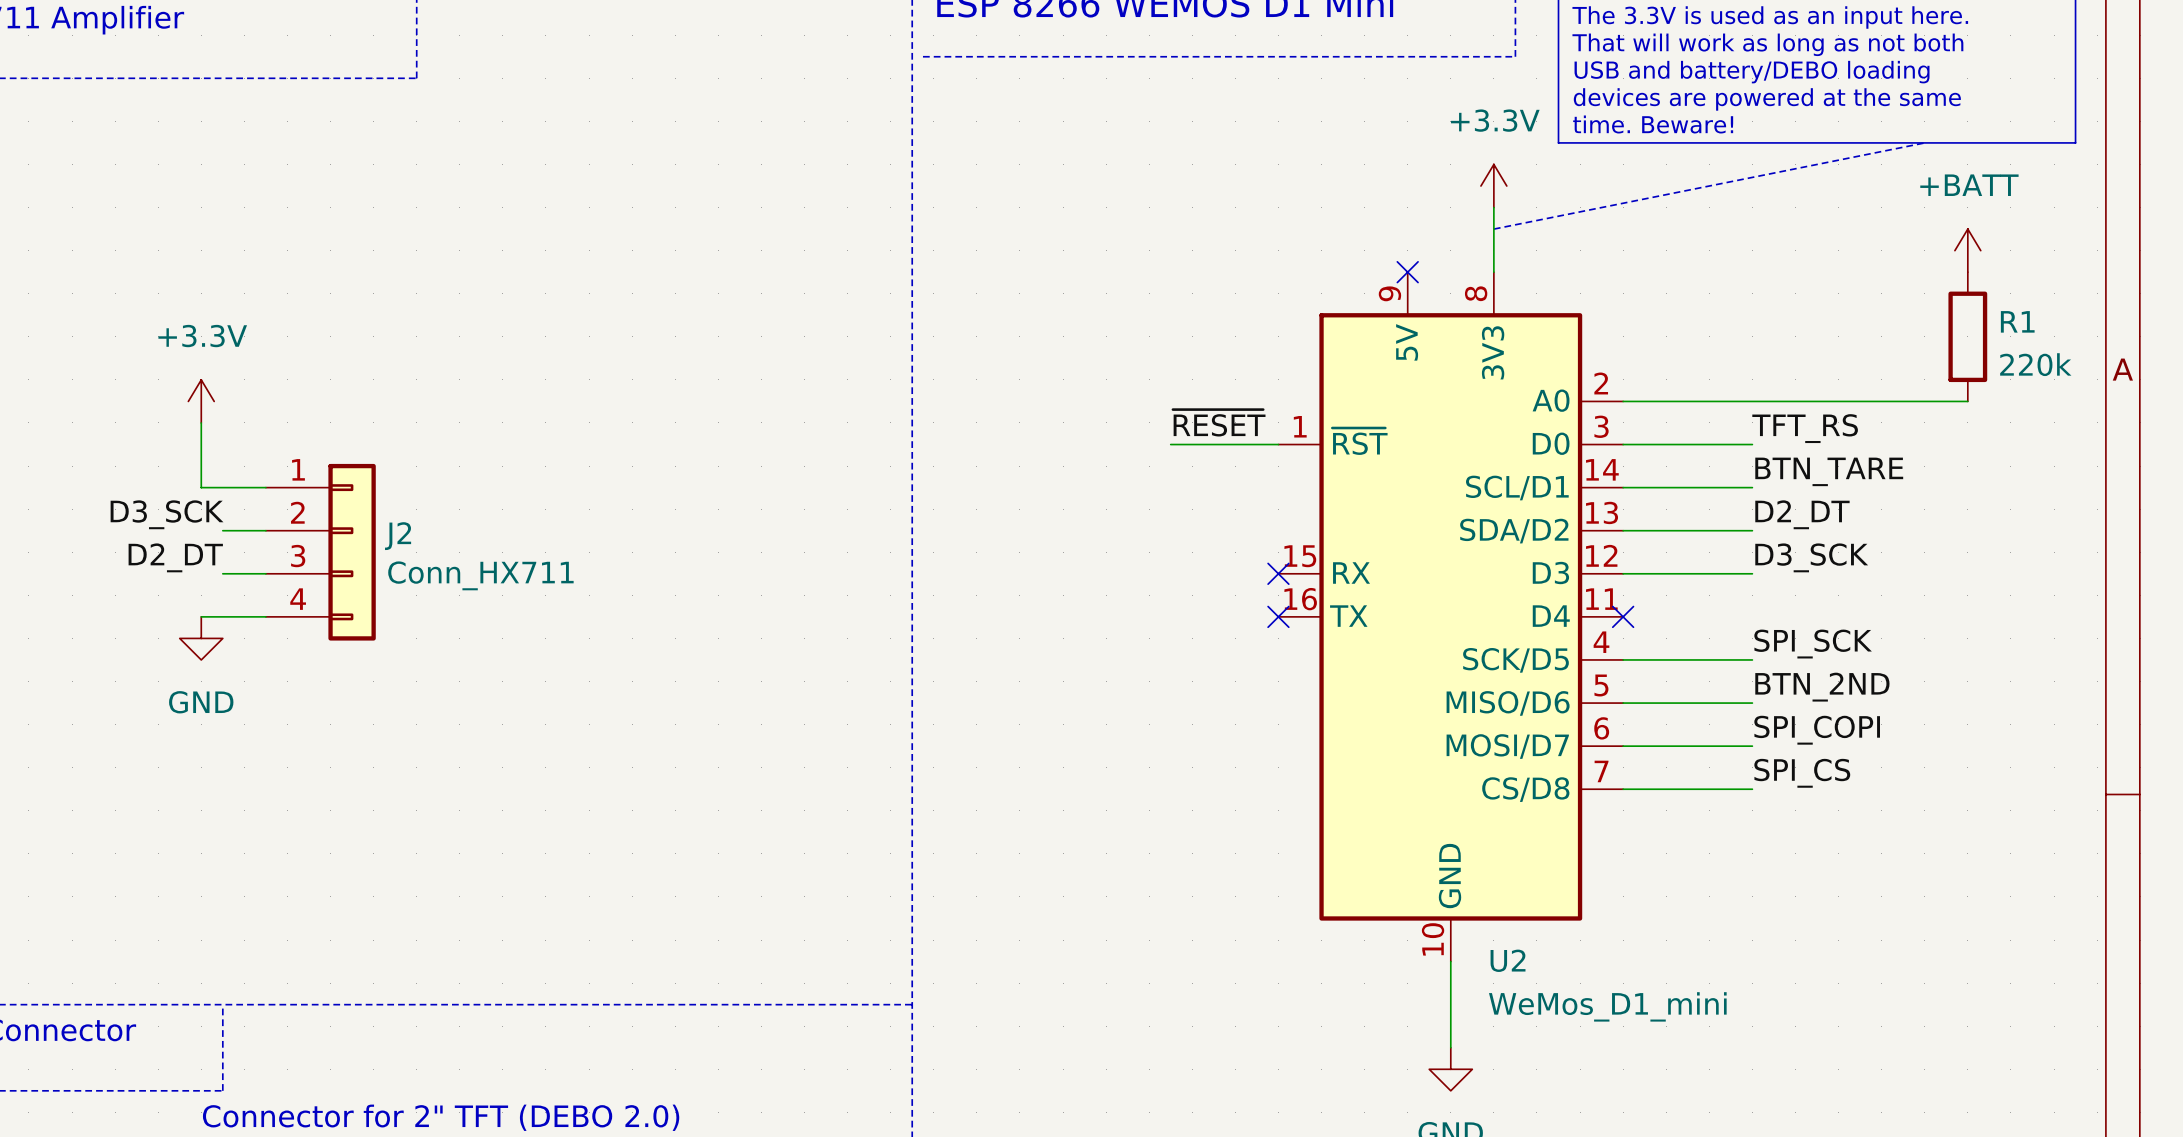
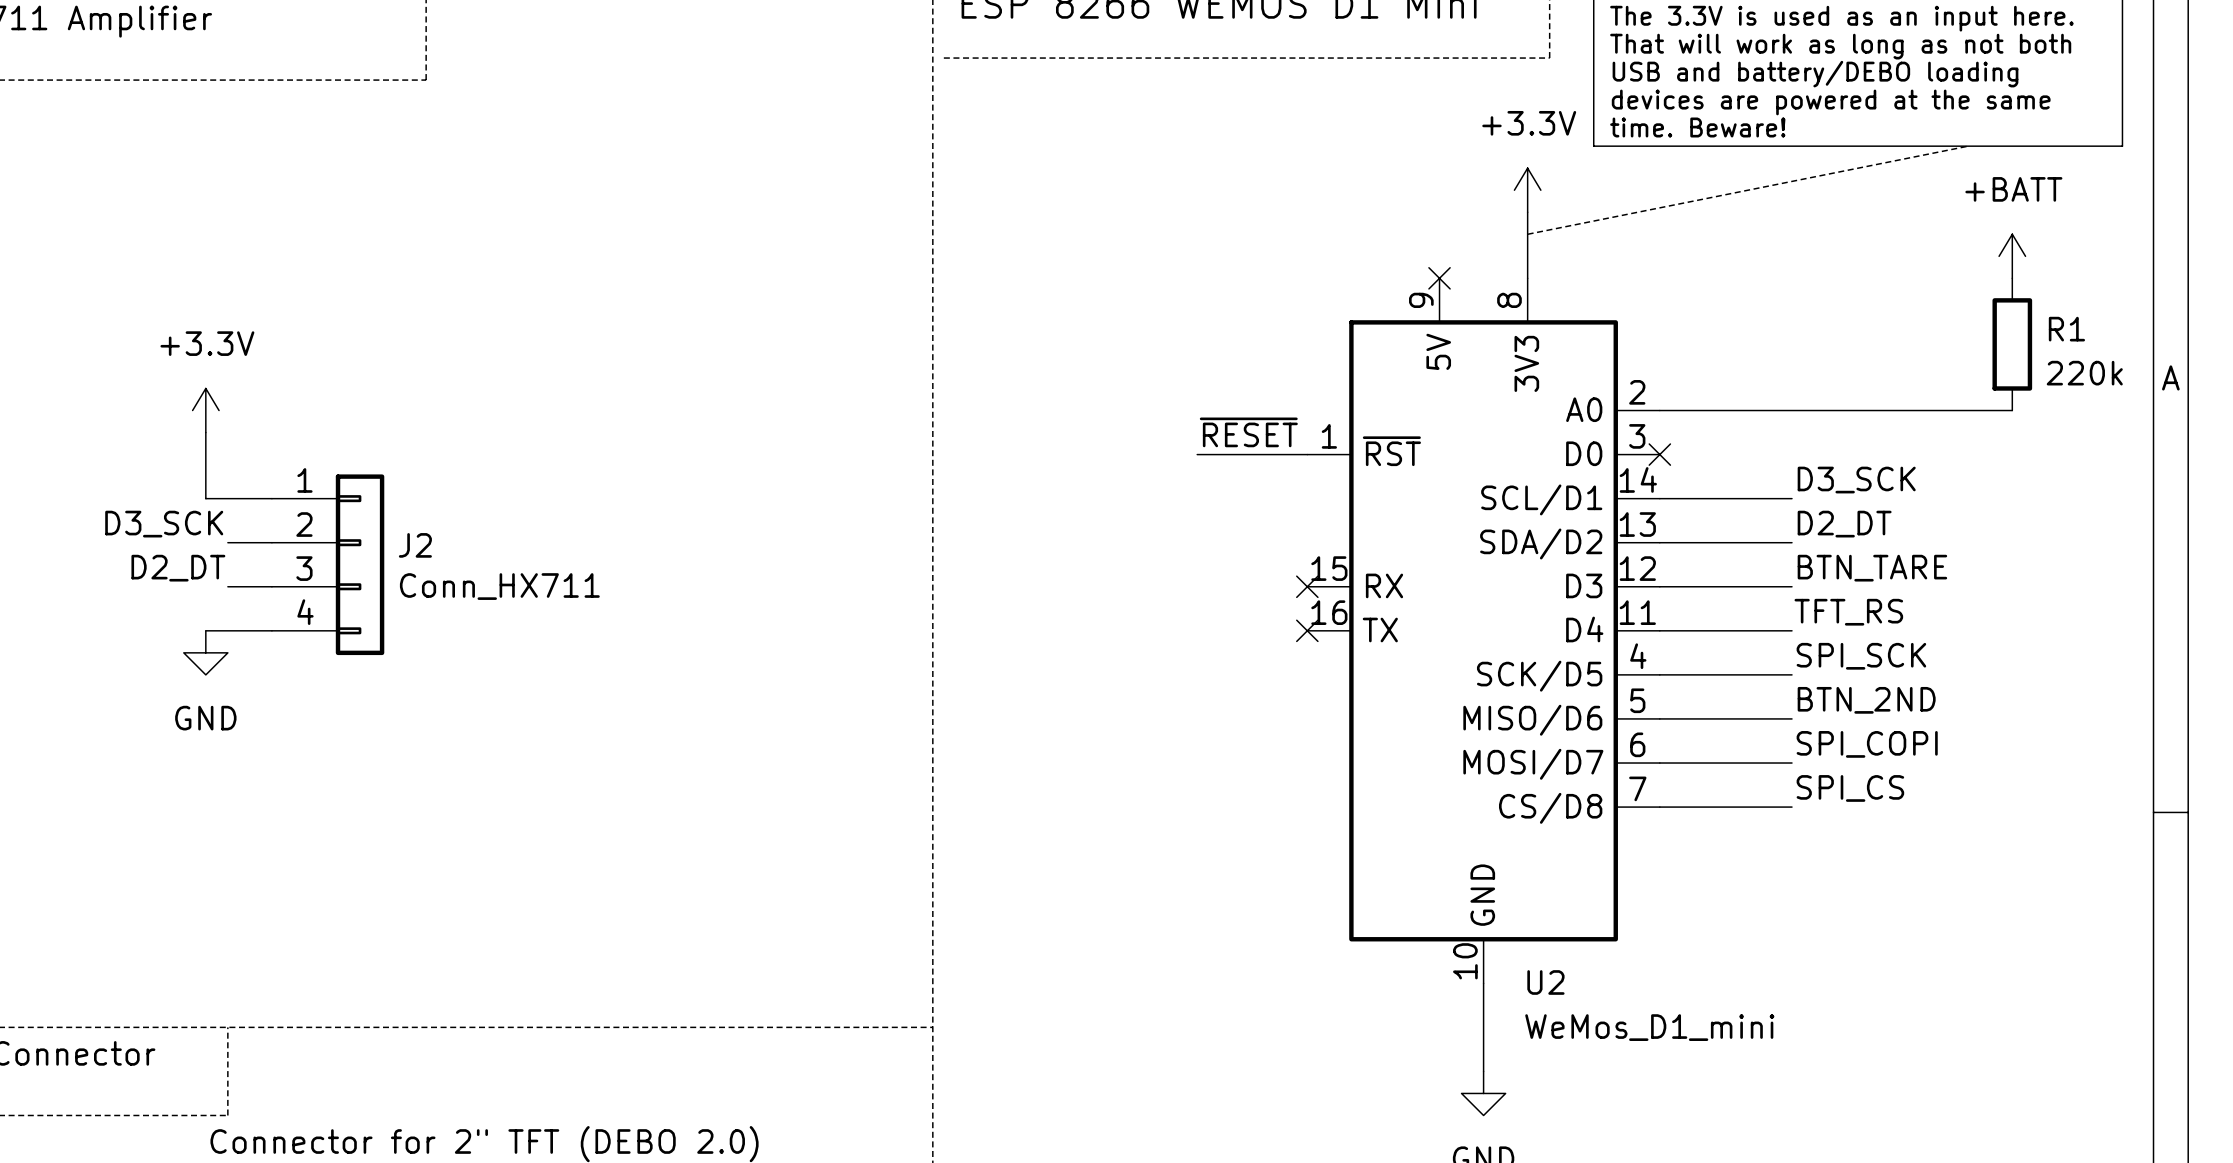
label position: TFT_RS (1805, 428) -> TFT_RS (1848, 612)
wire: (1623, 444) (1752, 444) -> (1659, 630) (1792, 630)
no-connect mark: none -> (1659, 454)
label: BTN_TARE (1829, 471) -> D3_SCK (1856, 480)
label: D3_SCK (1811, 557) -> BTN_TARE (1872, 568)
no-connect mark: (1623, 616) -> none

